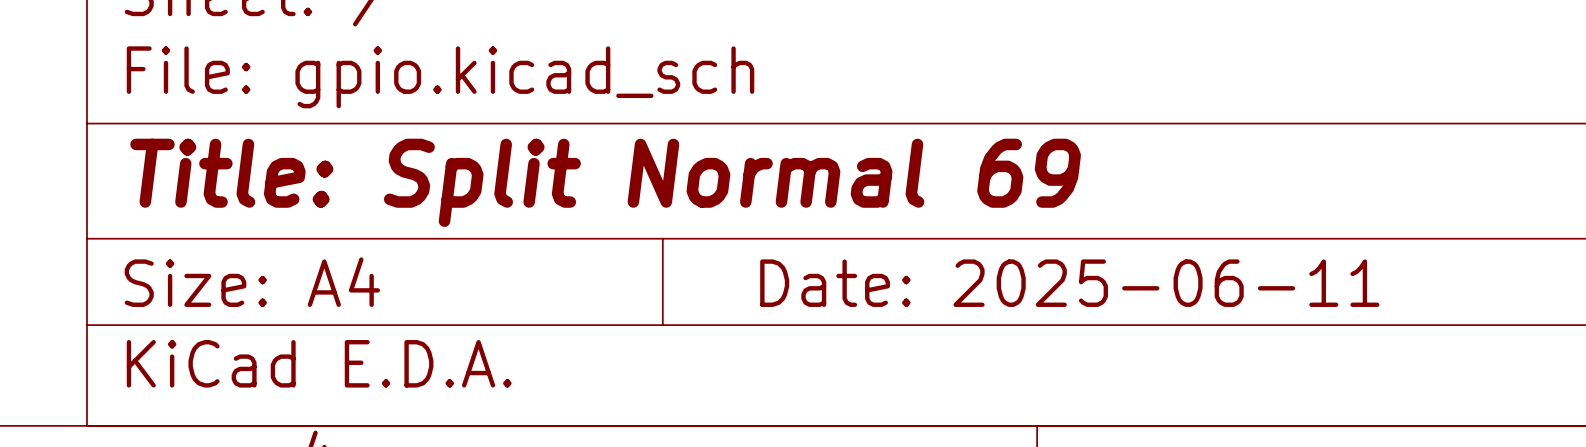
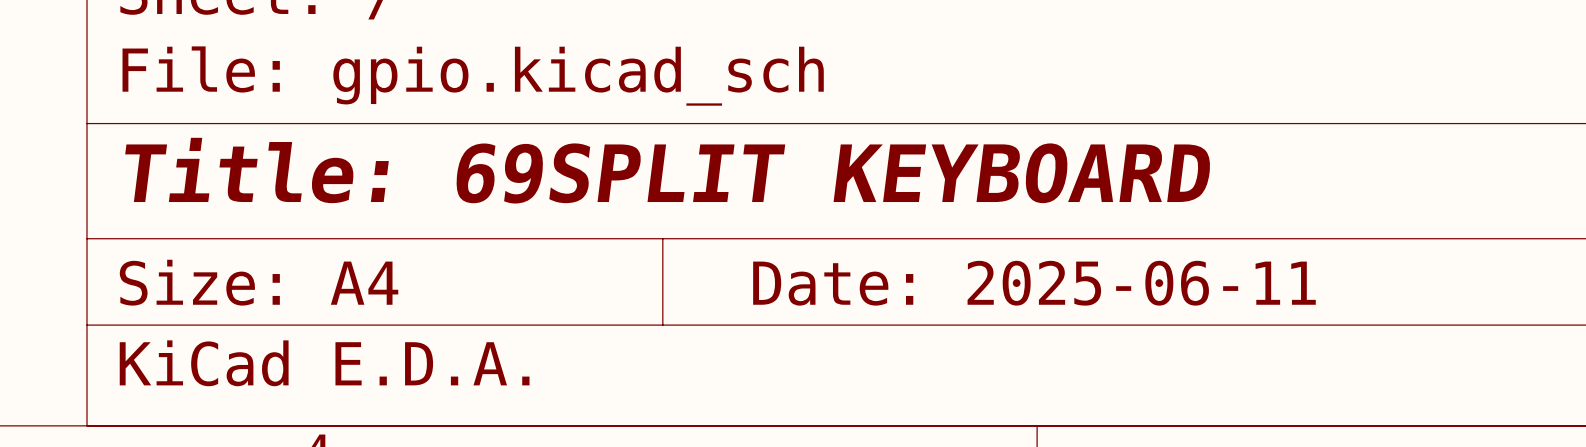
title block: Title: Split Normal 69 (605, 182) -> Title: 69SPLIT KEYBOARD (668, 170)

